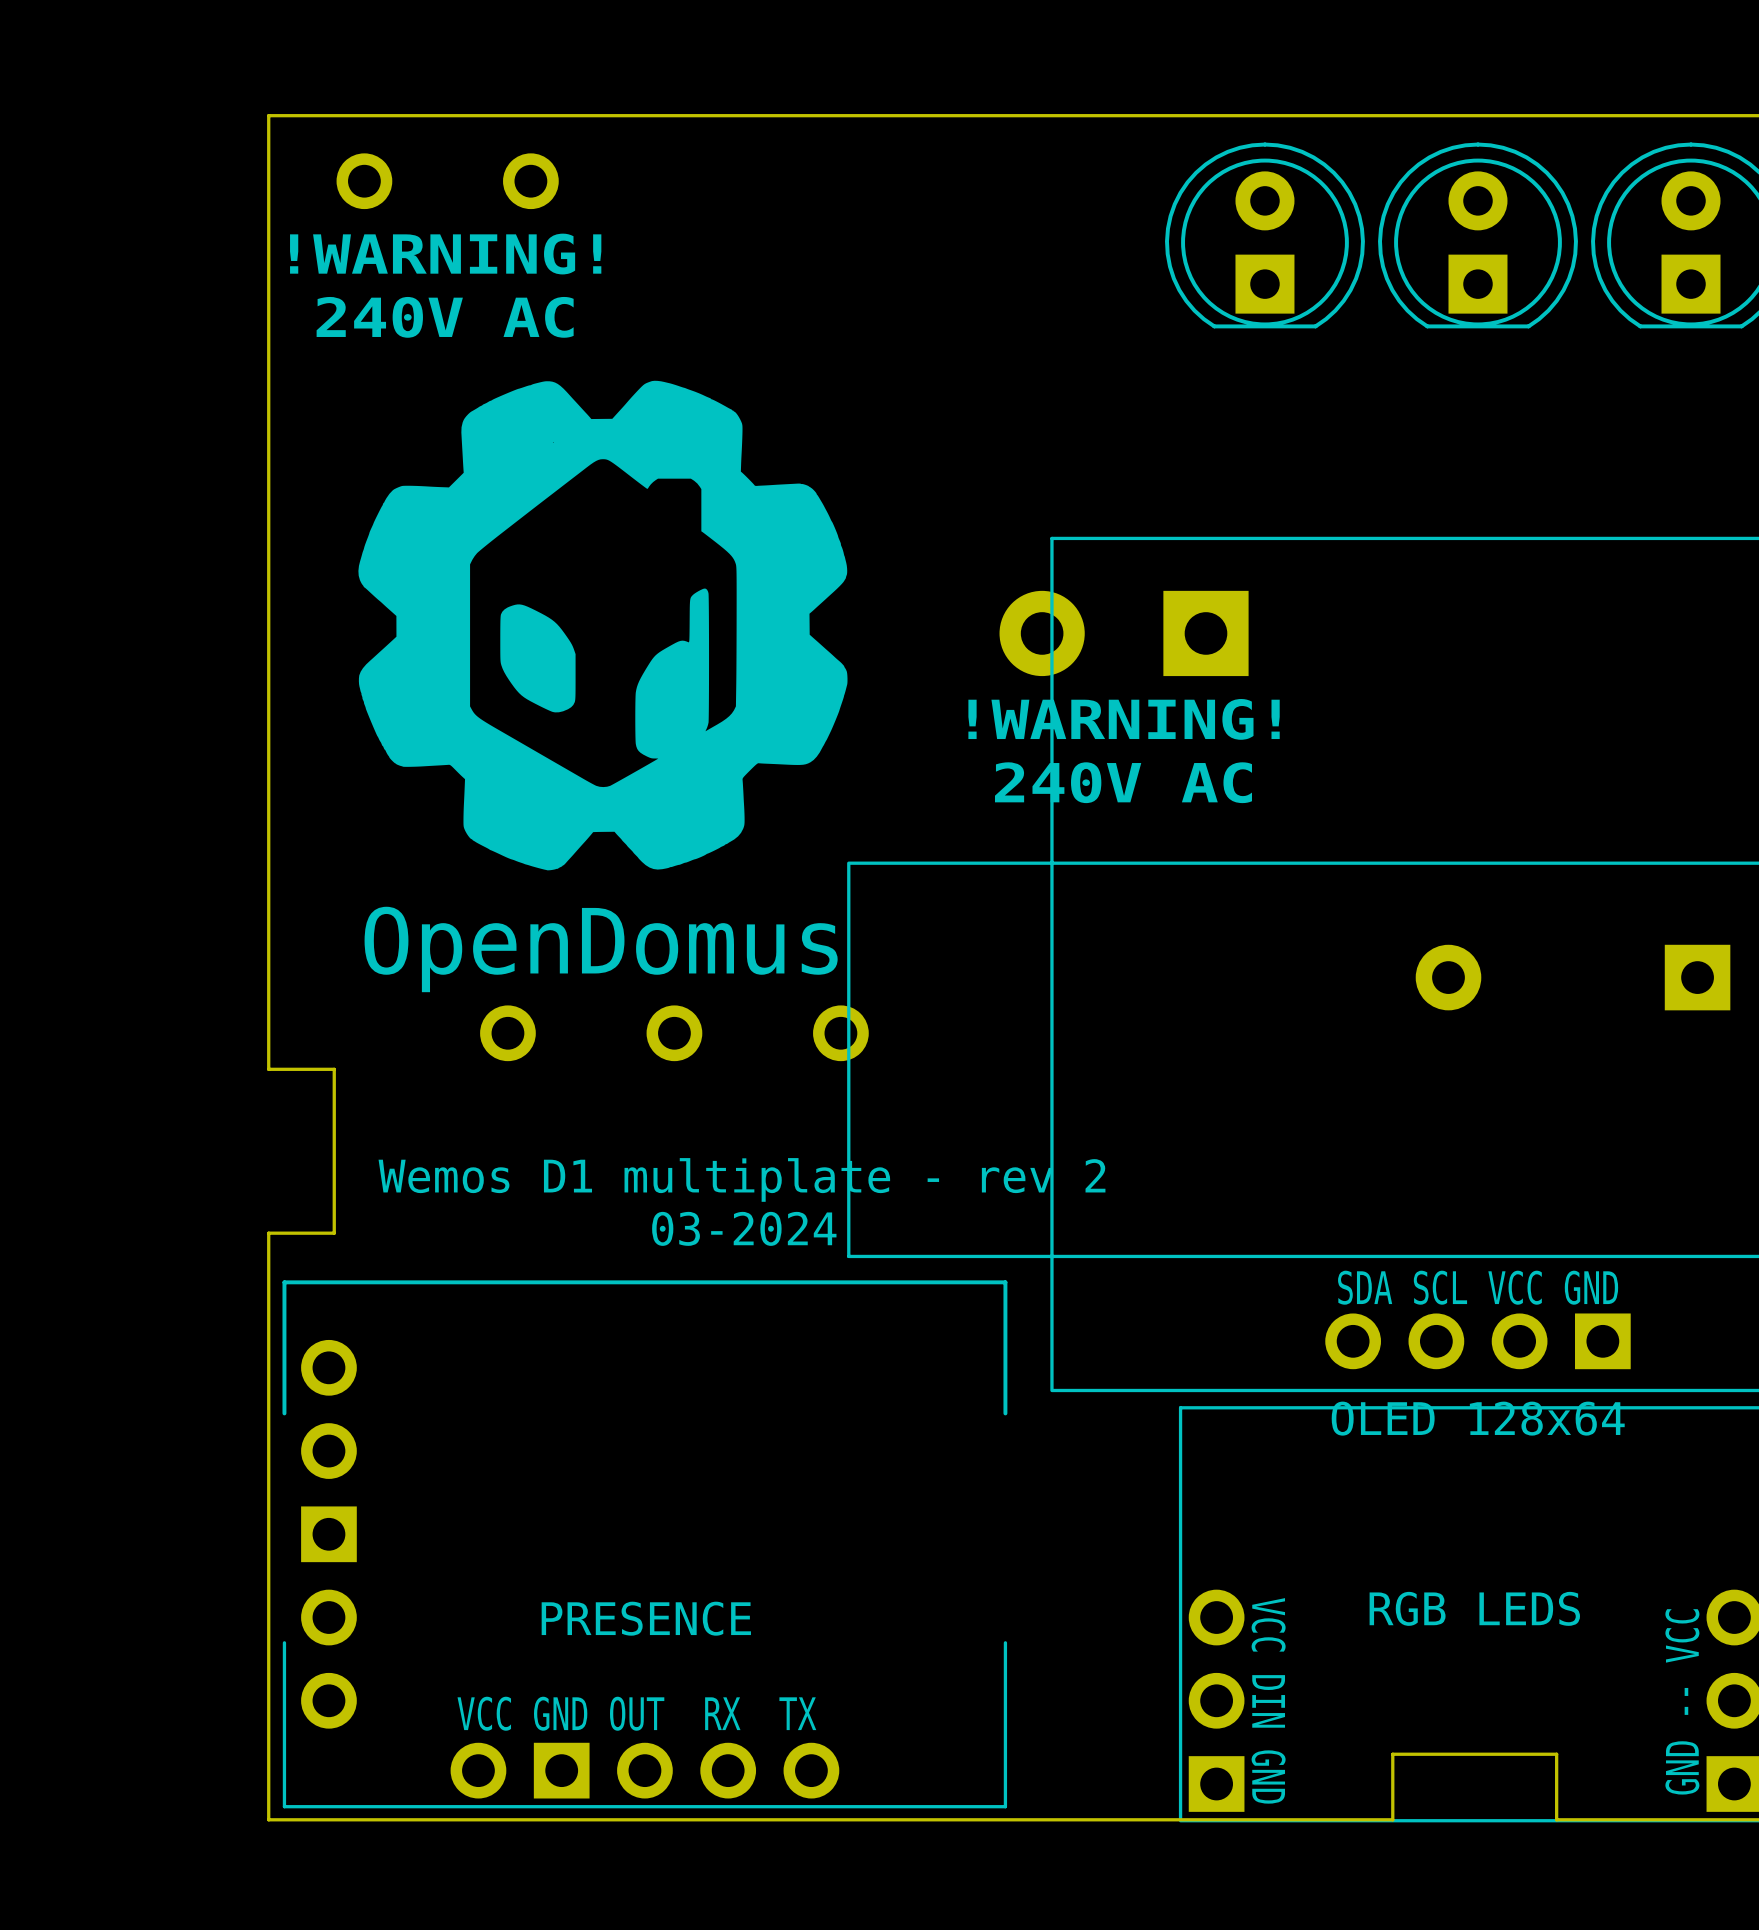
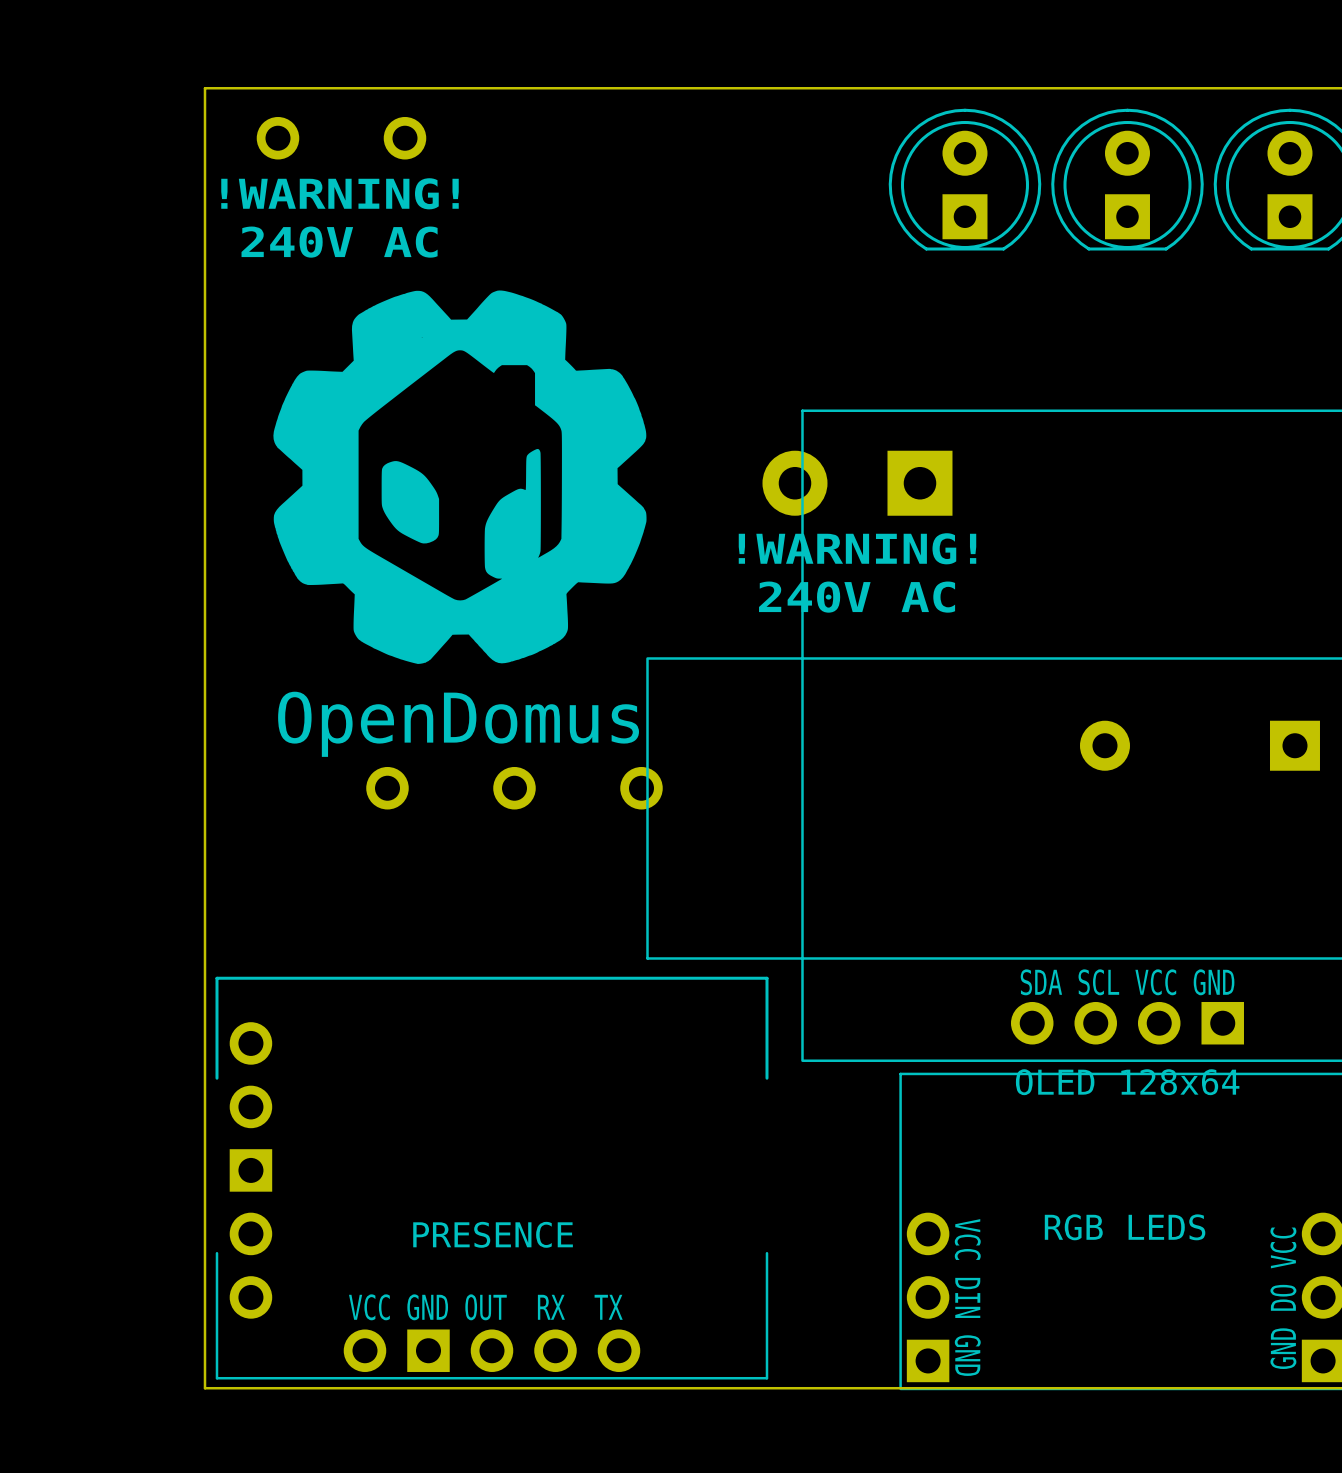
board edge: (268, 1069) (334, 1069) (334, 1233) (268, 1233) -> (204, 815) (204, 940)
text: Wemos D1 multiplate - rev 2 (742, 1179) -> none
text: 03-2024 (744, 1228) -> none
part text: GND -- VCC (1682, 1701) -> GND DO VCC (1283, 1298)
board edge: (1392, 1819) (1392, 1754) (1556, 1754) (1556, 1819) -> (1062, 1388) (1187, 1388)

